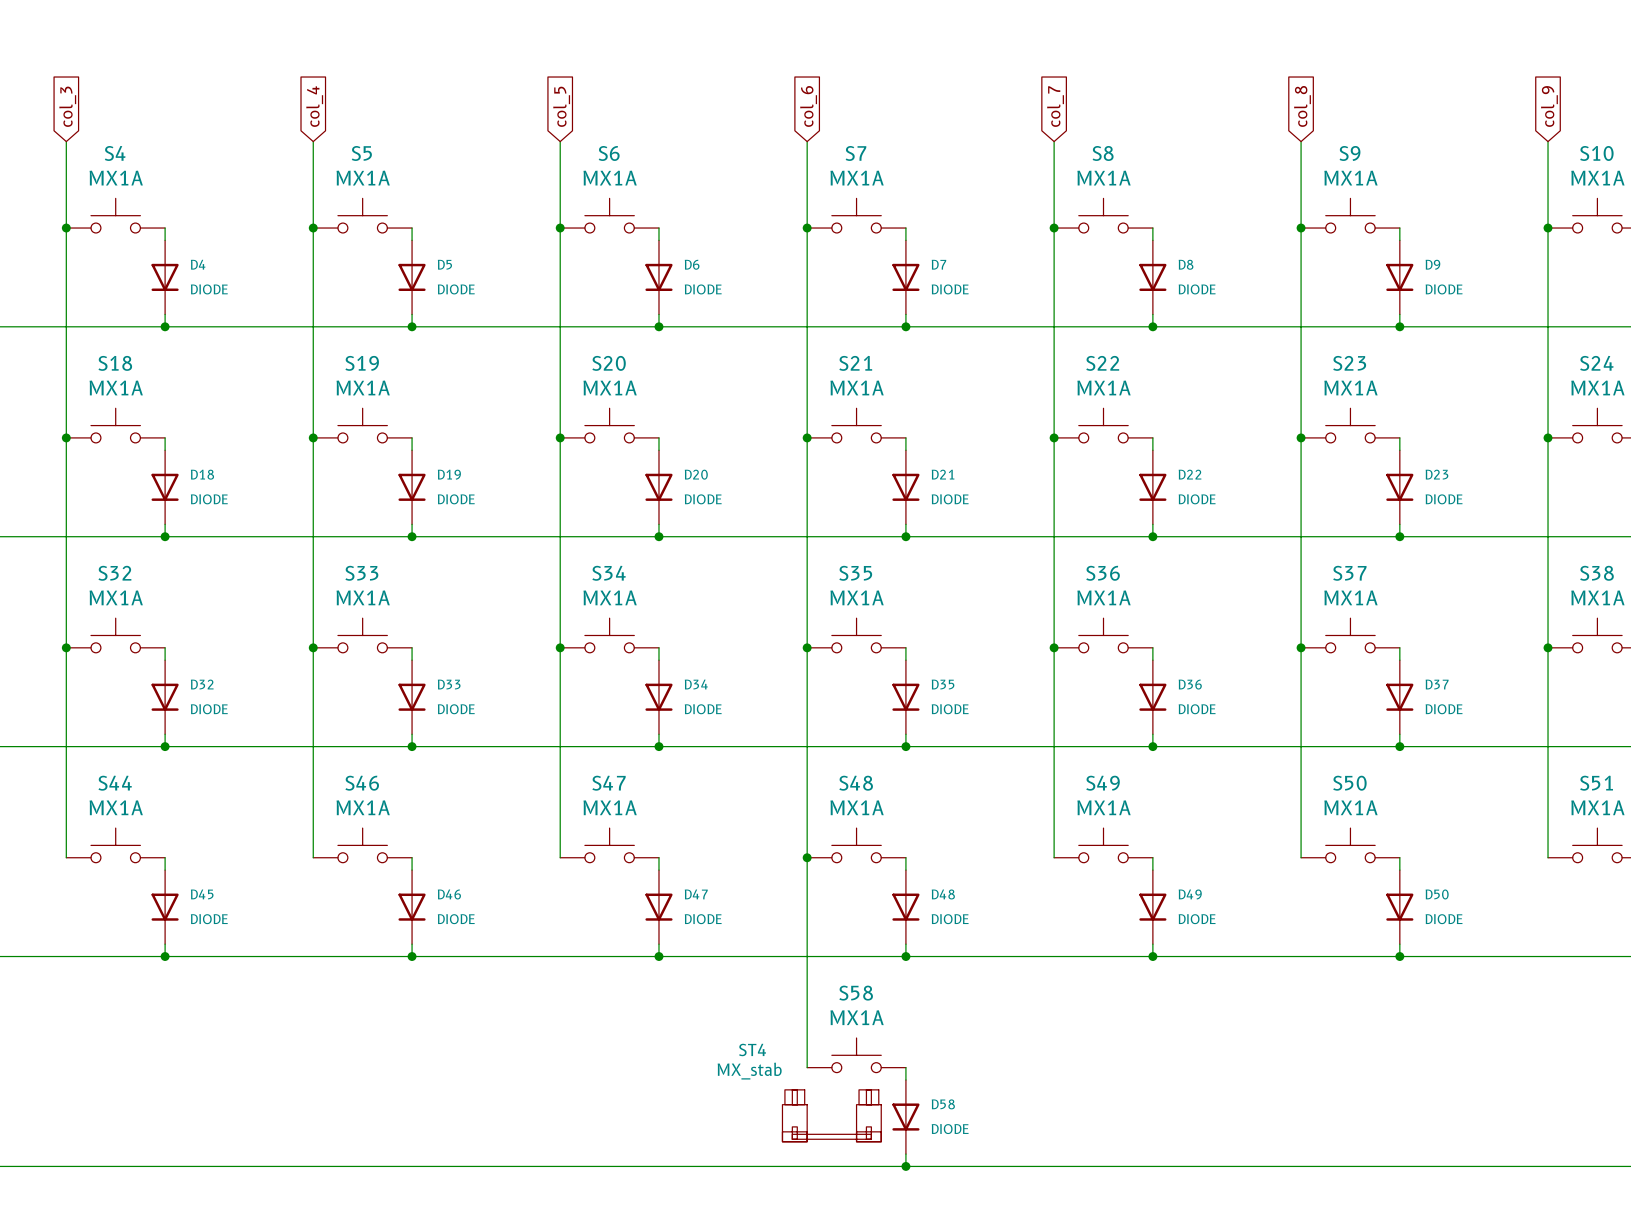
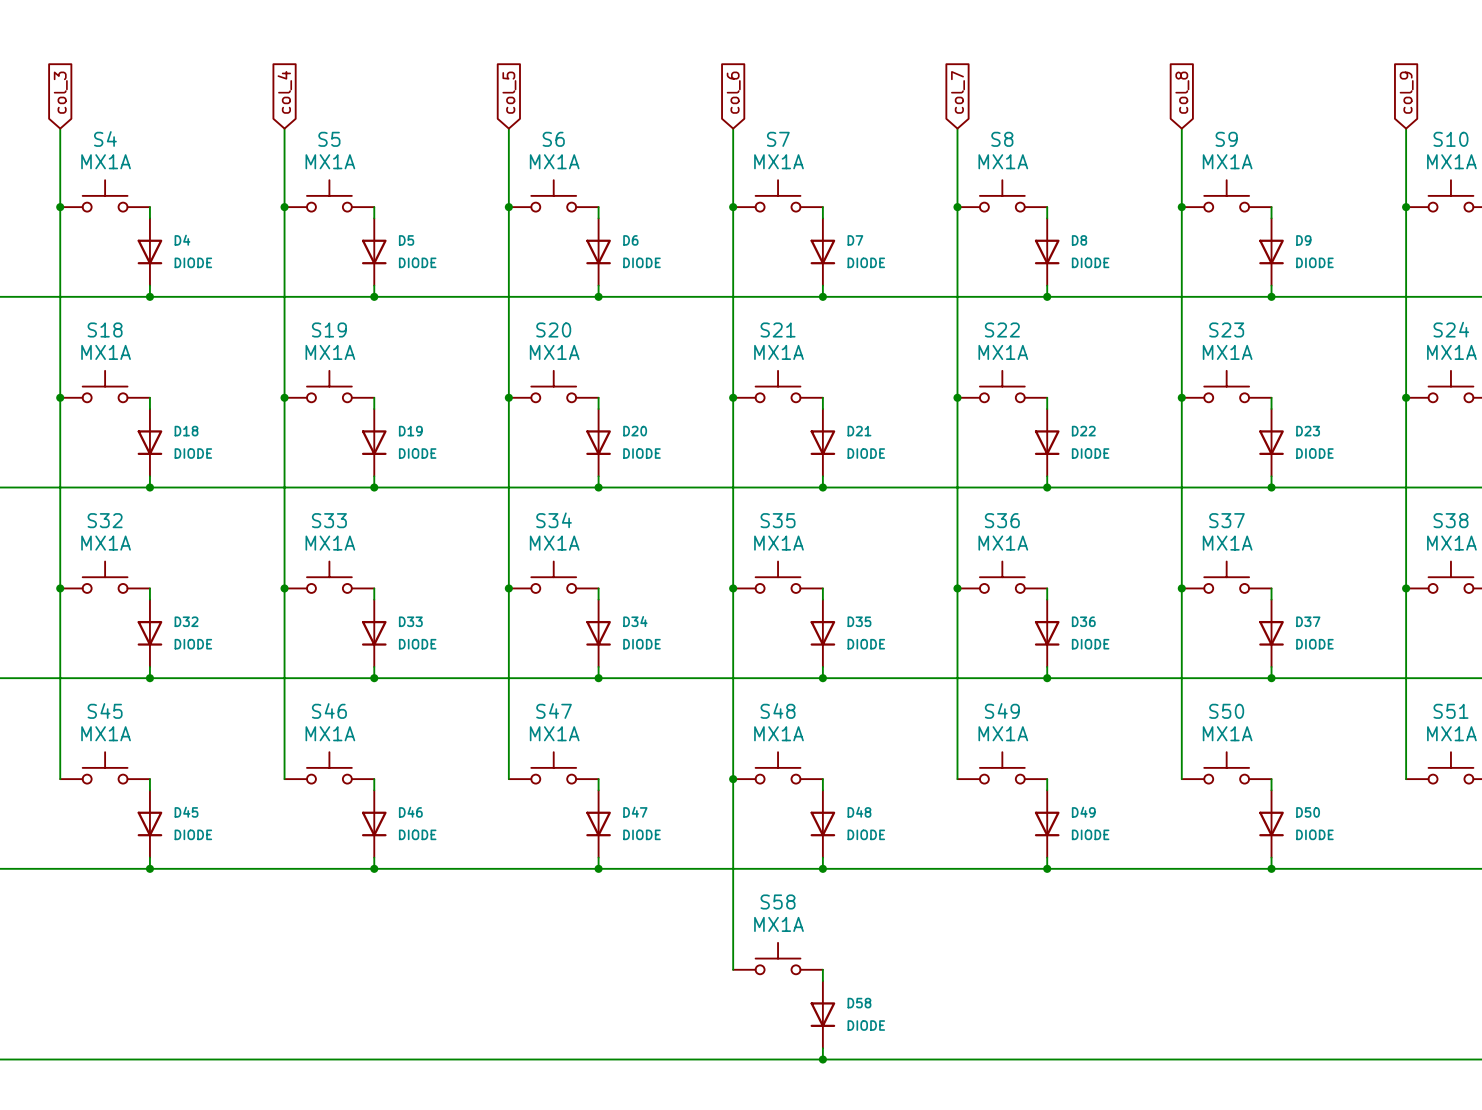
S44 name: S44 (115, 783) -> S45 (105, 711)
ST4: MX_stab (831, 1115) -> none

